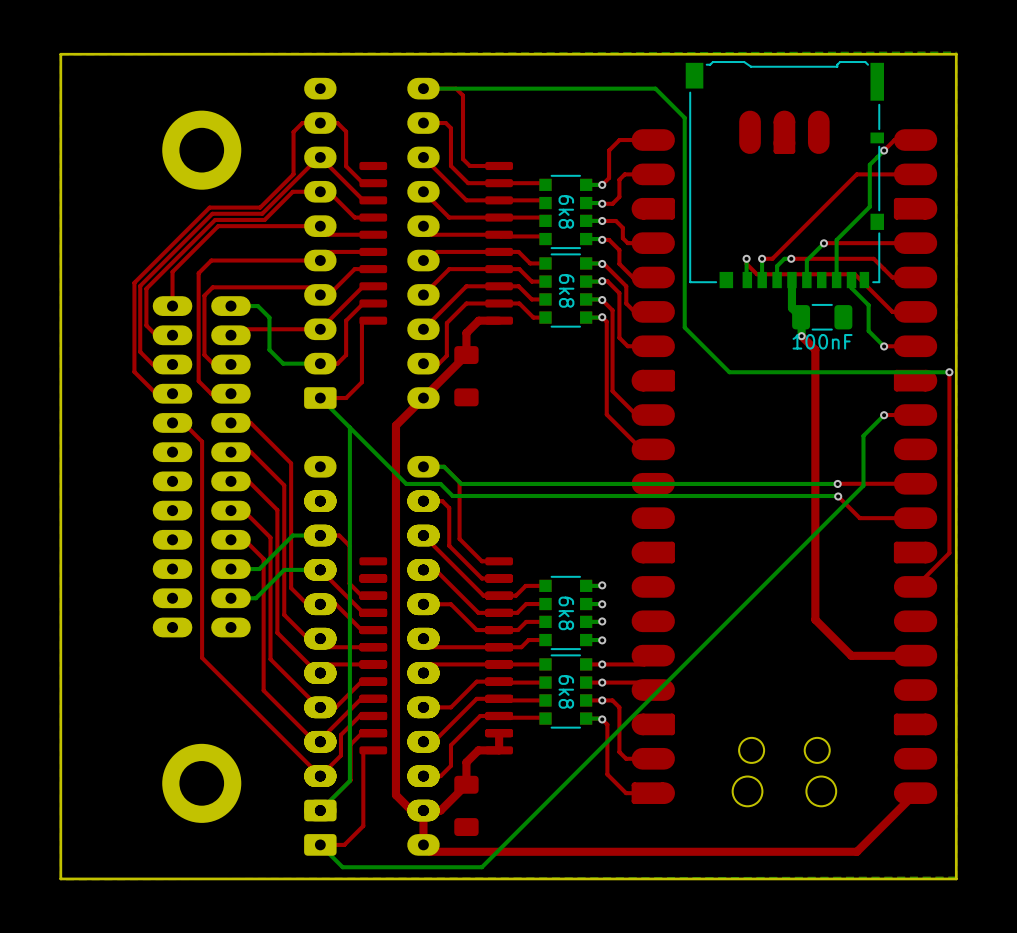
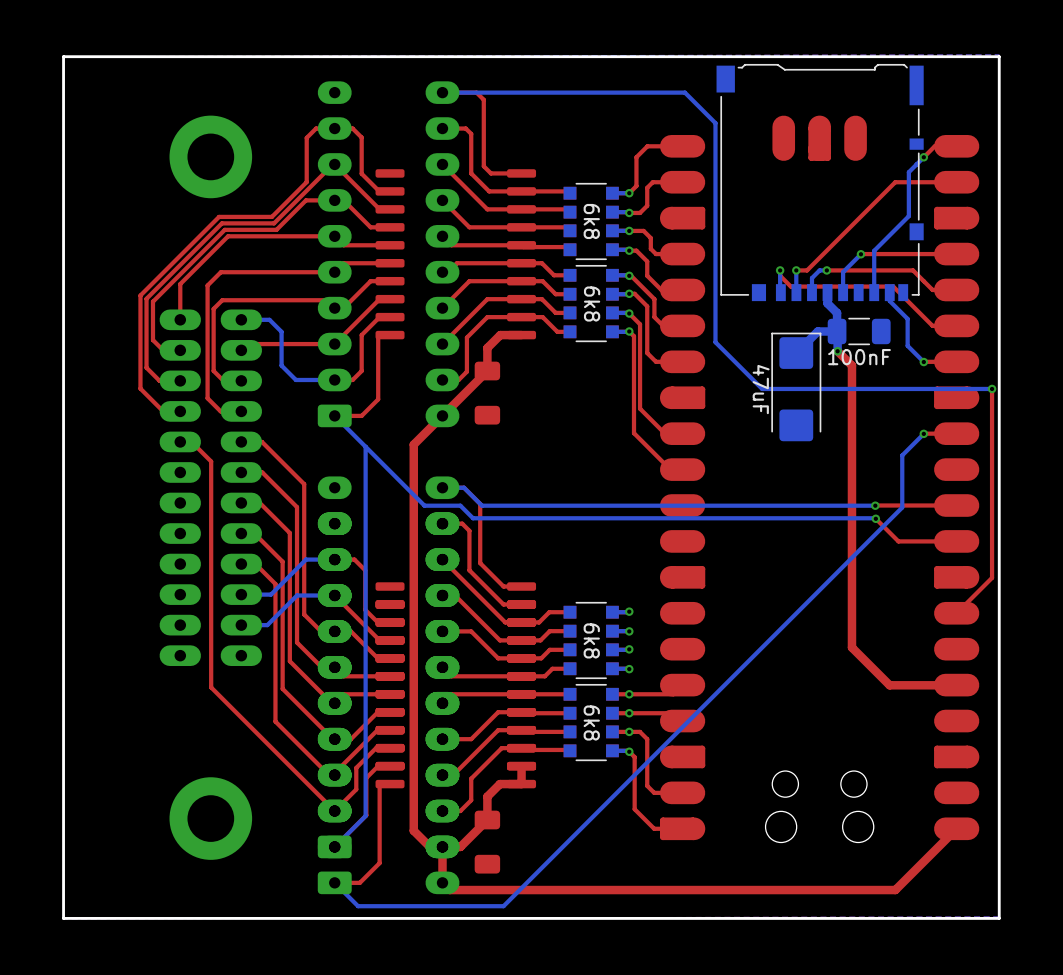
bottom track: (791, 290) (791, 308) (801, 317) -> (827, 303) (837, 312) (837, 331) (817, 331) (796, 353)
part: none -> 47uF (796, 386)

